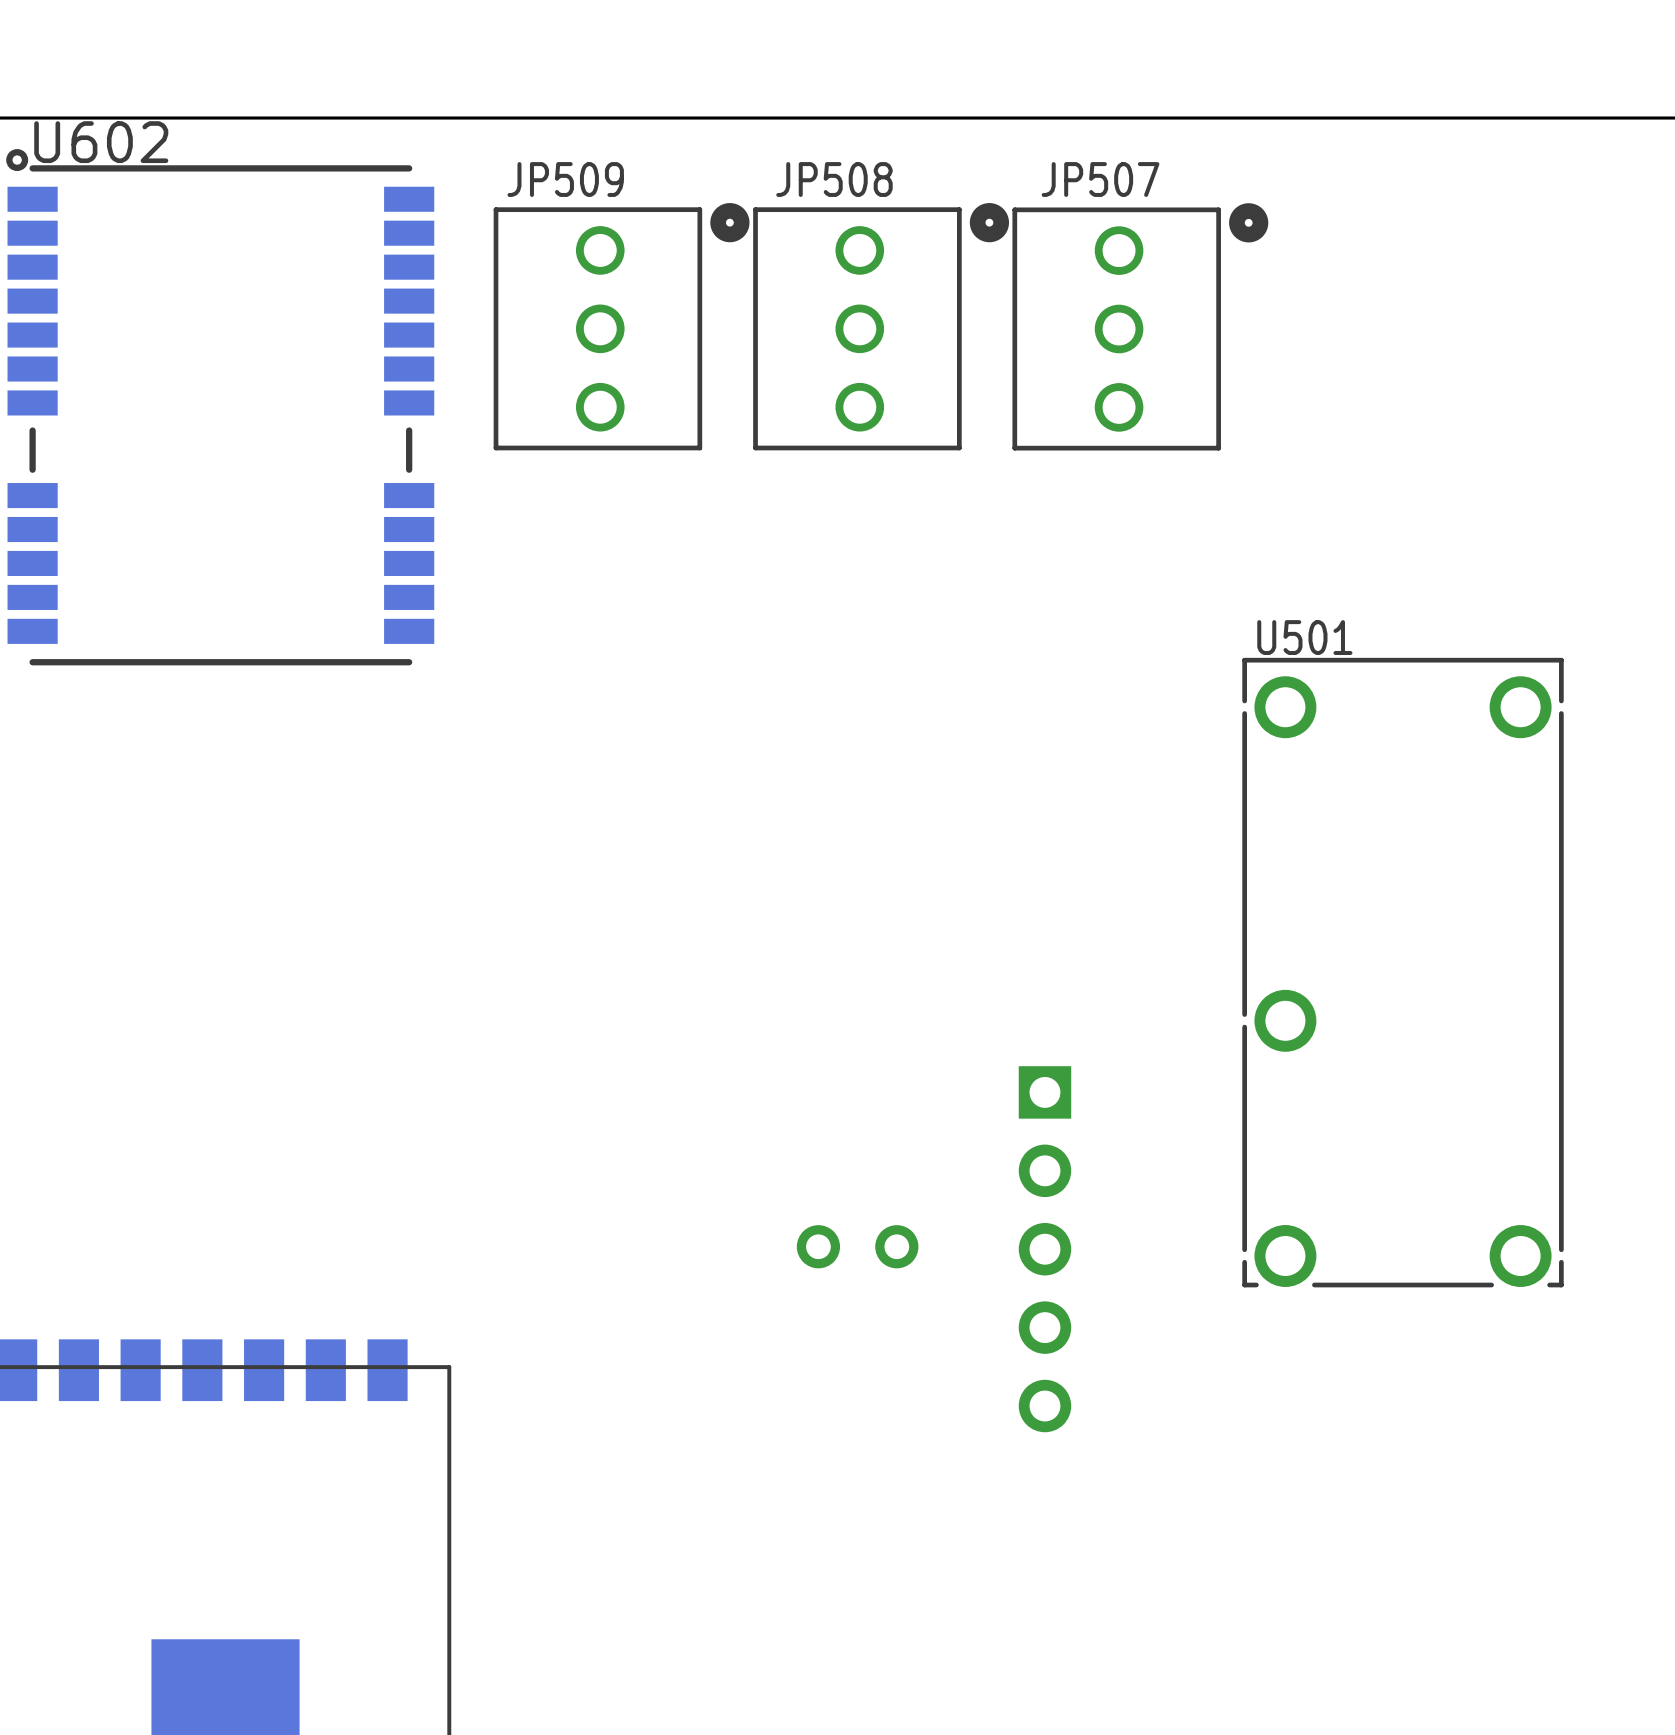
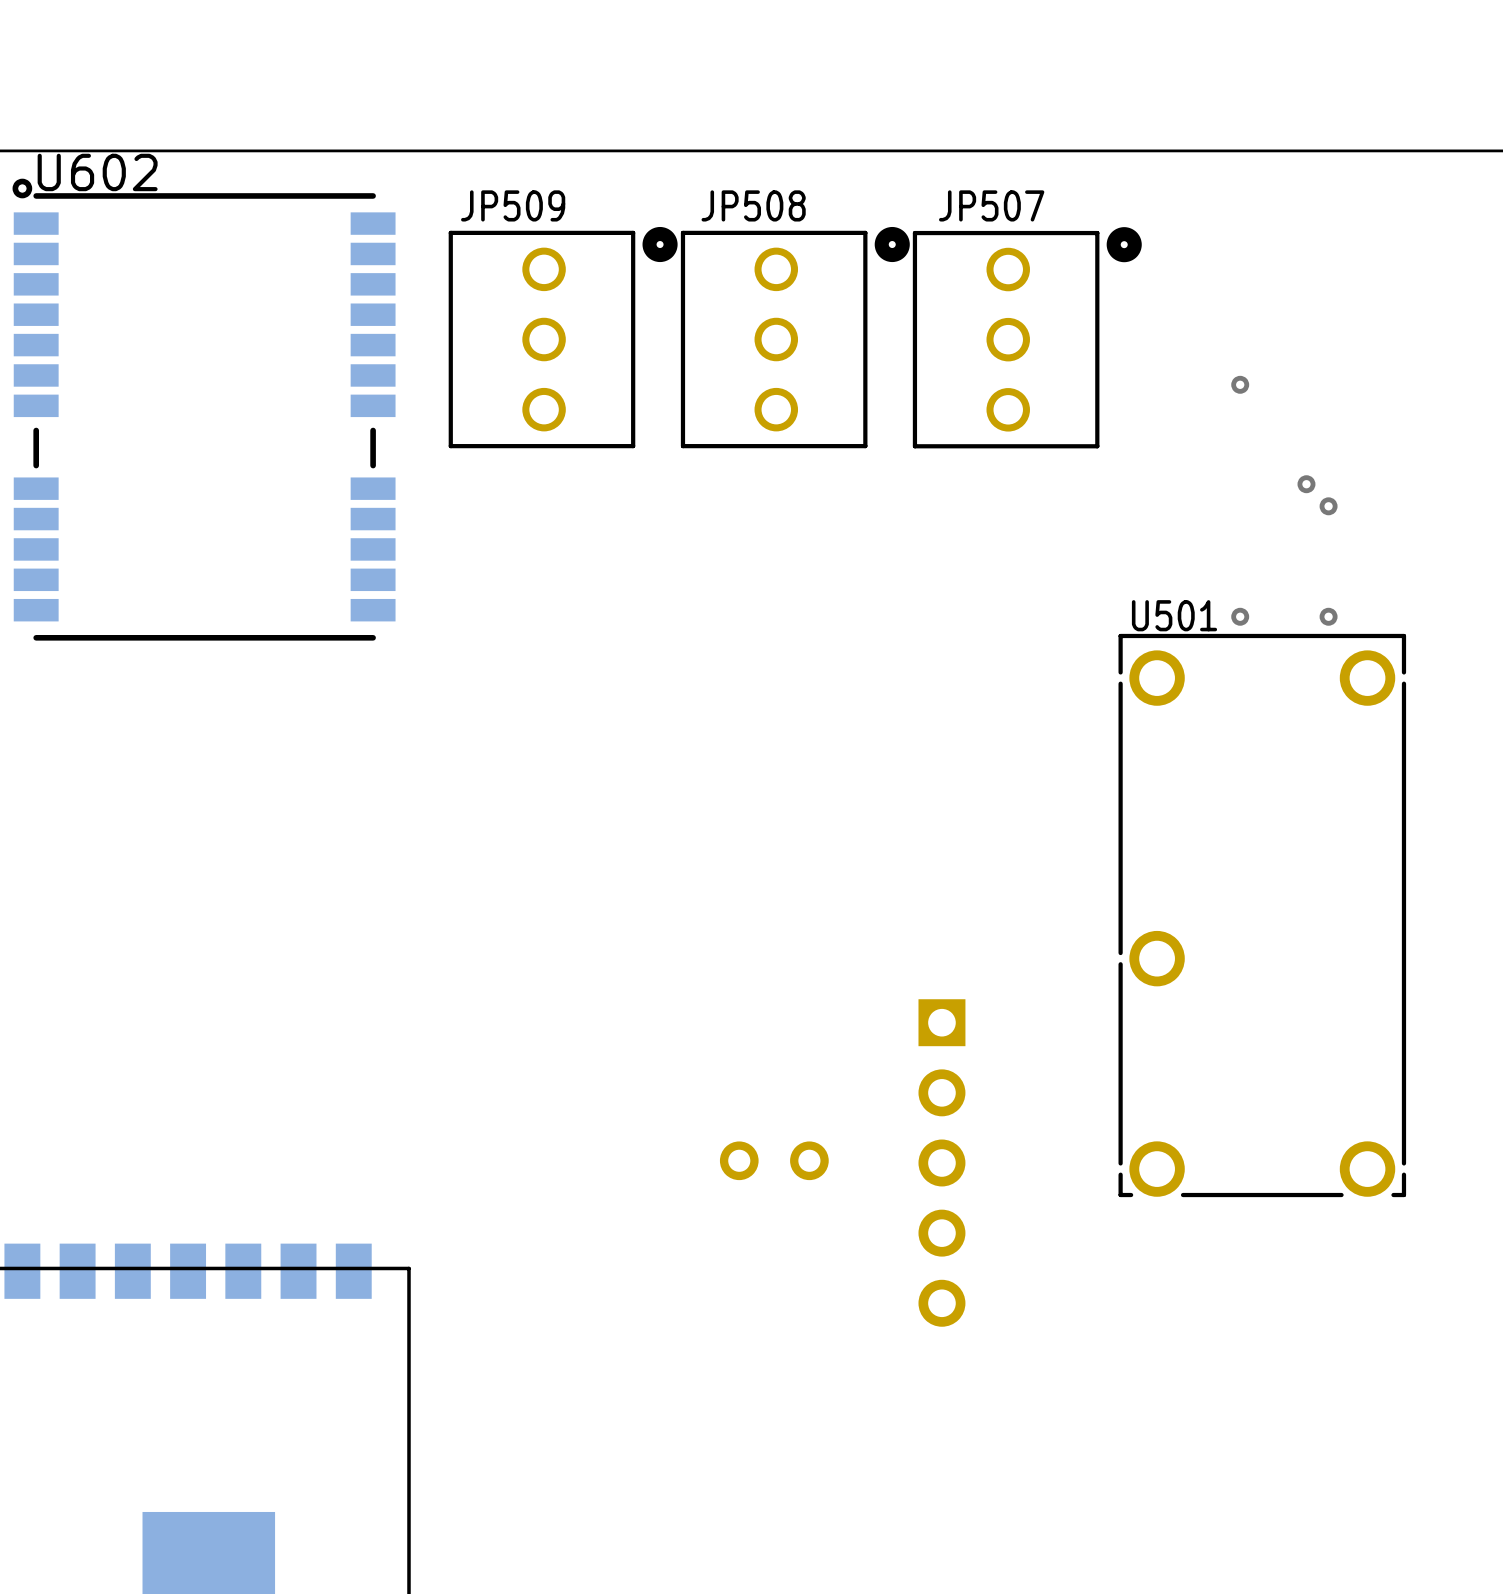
via: none -> (1240, 384)
via: none -> (1306, 484)
via: none -> (1328, 506)
via: none -> (1240, 616)
via: none -> (1328, 616)

